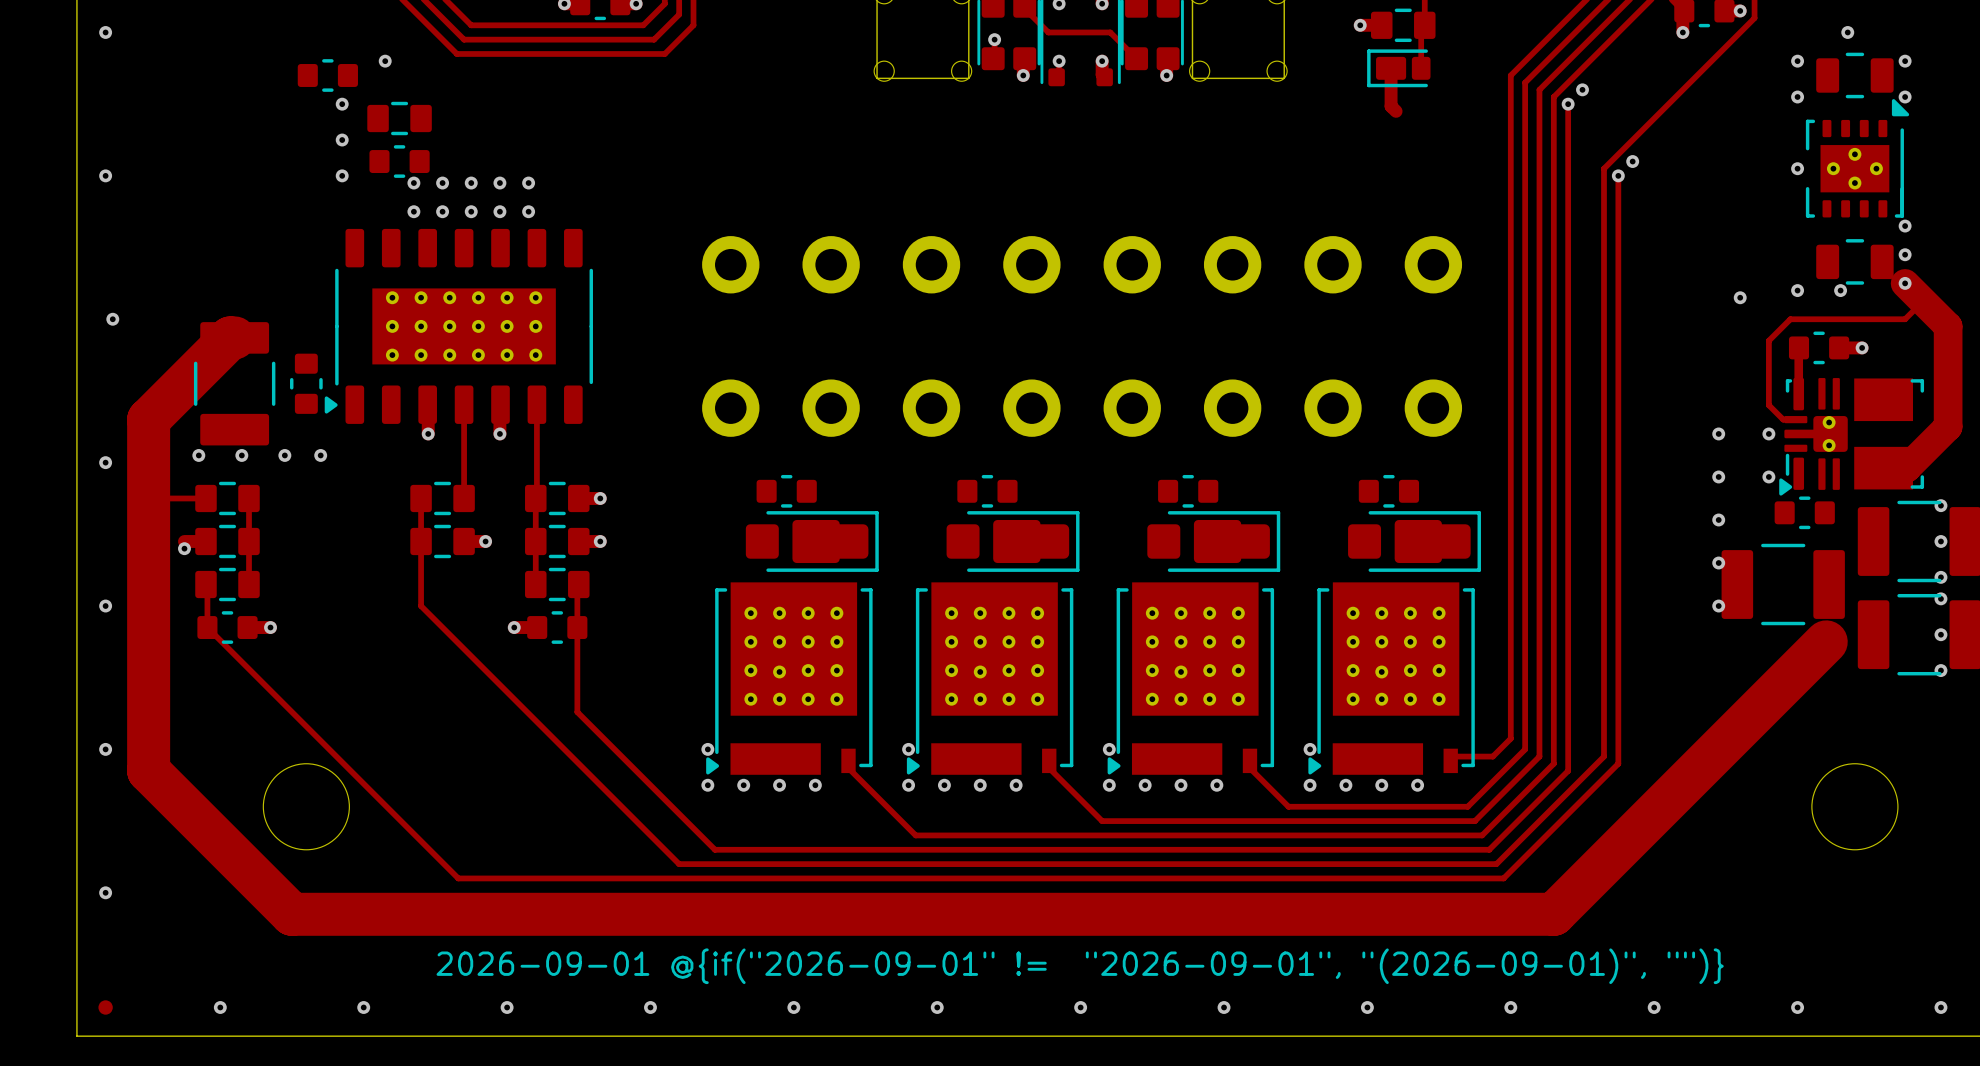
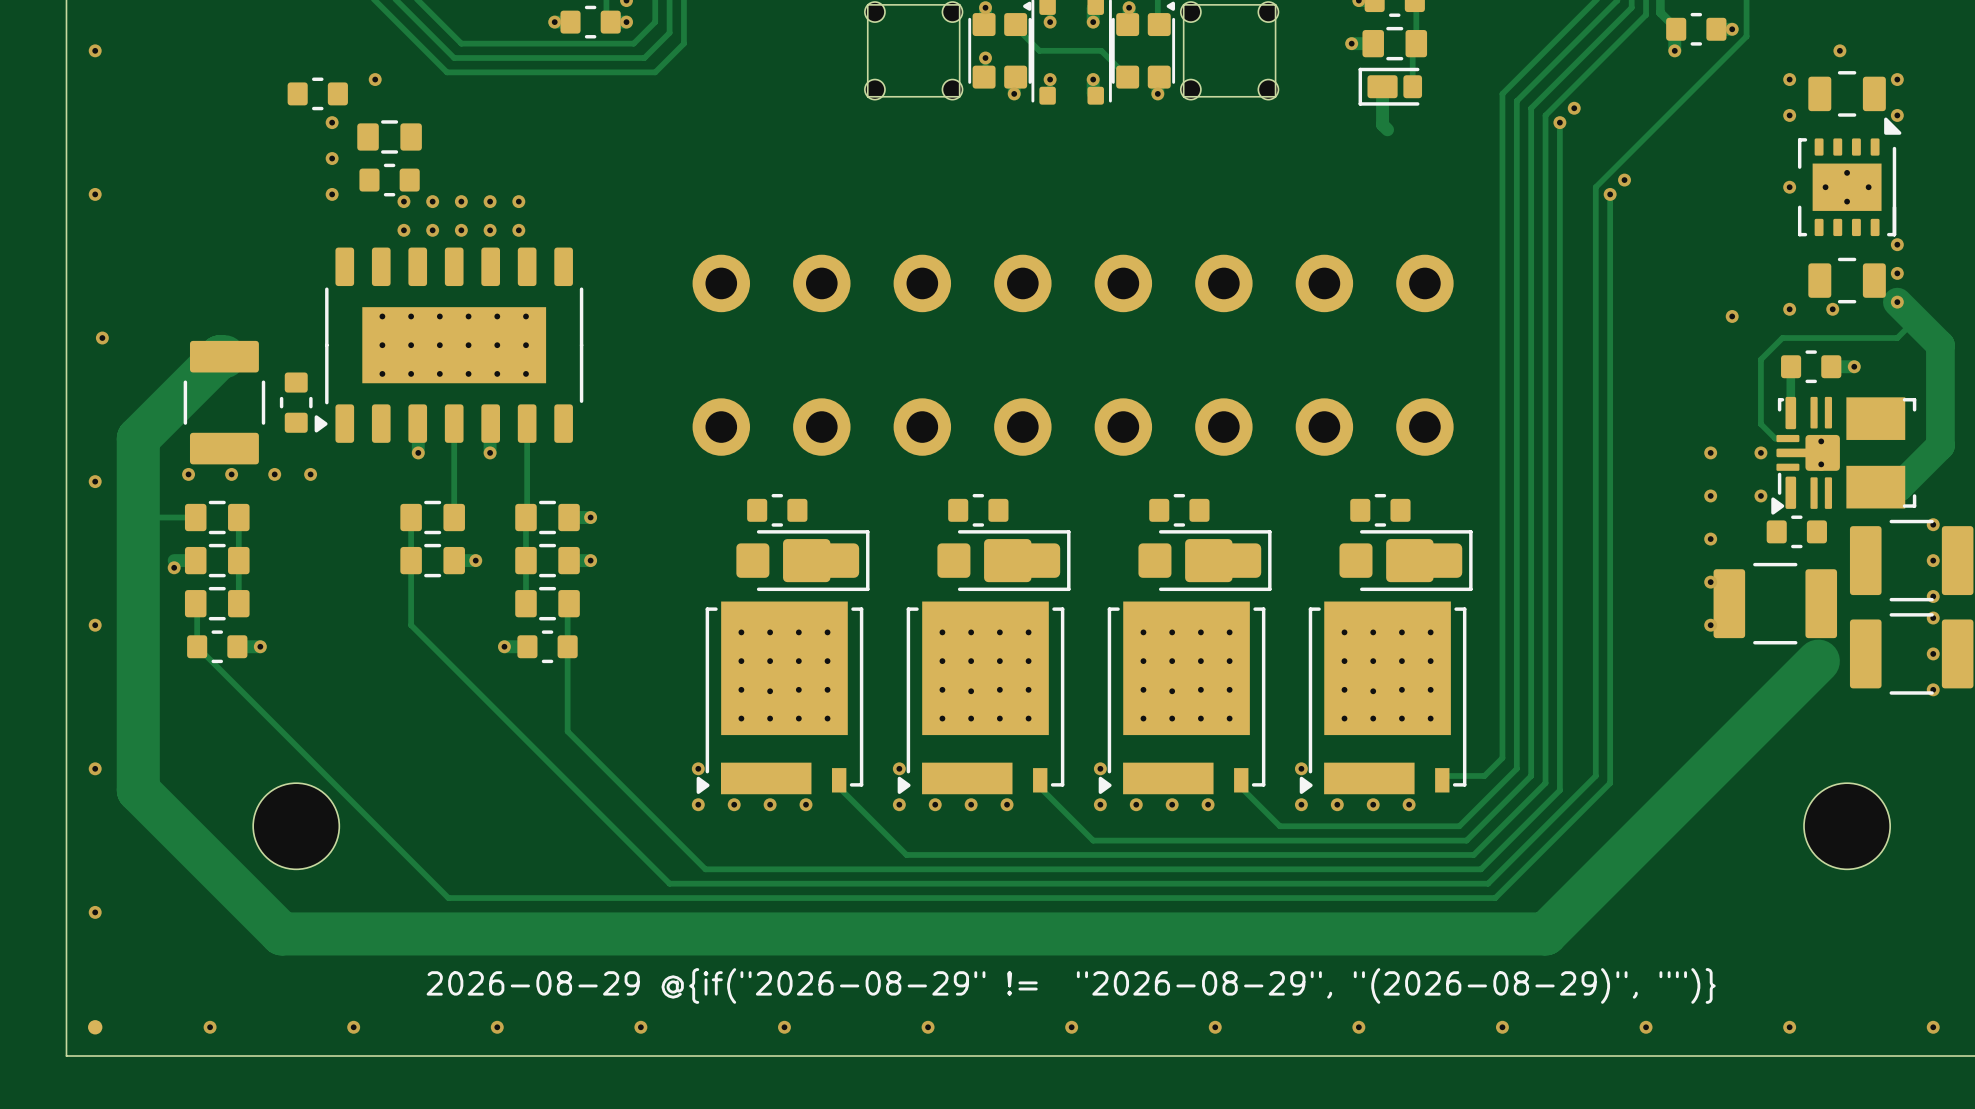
drawing shape: [436, 948, 1724, 985] -> [426, 968, 1716, 1004]

